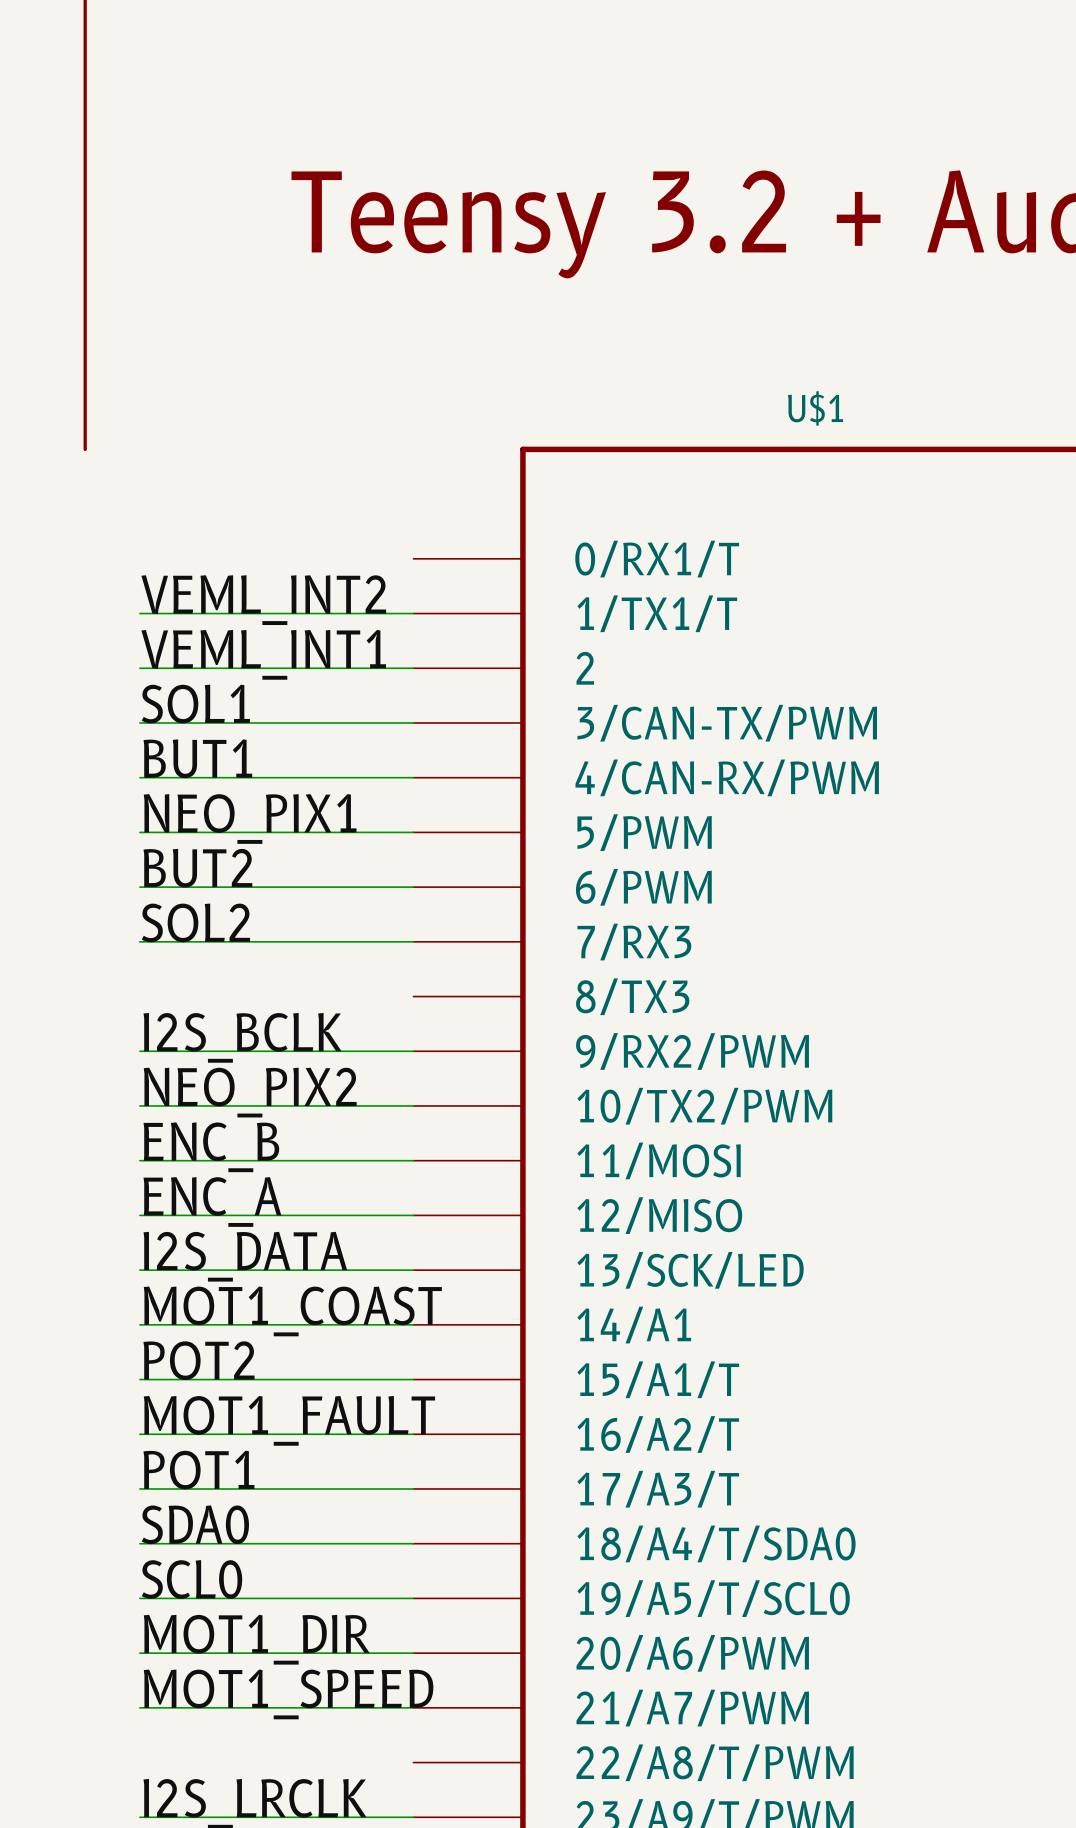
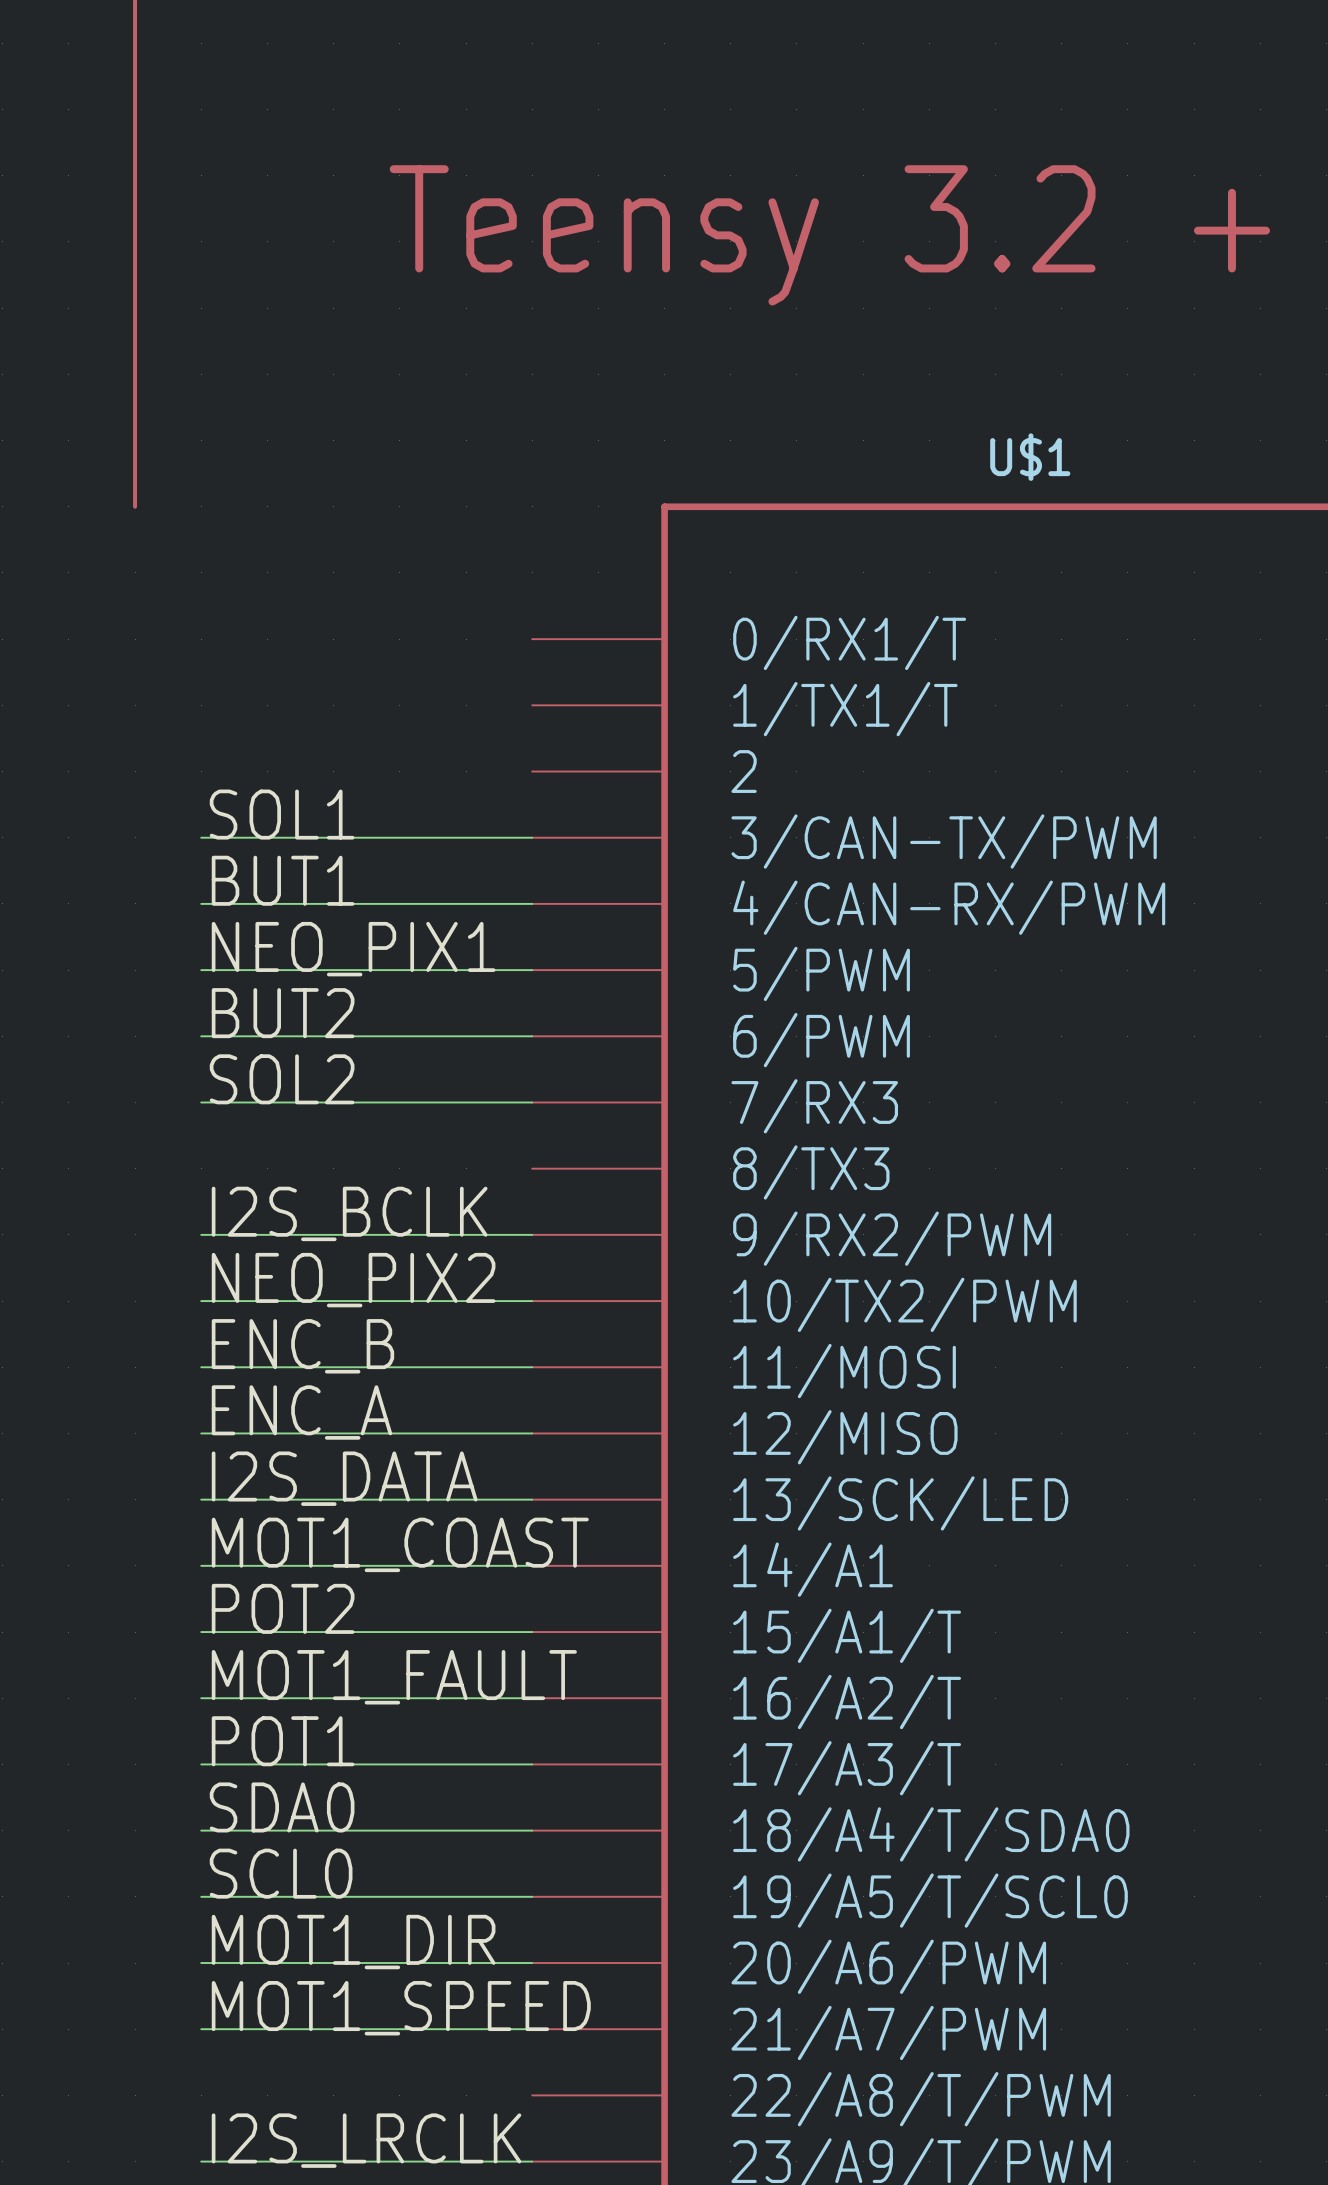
label: VEML_INT2 (263, 600) -> none
wire: (139, 613) (413, 613) -> none
label: VEML_INT1 (263, 654) -> none
wire: (139, 668) (413, 668) -> none

